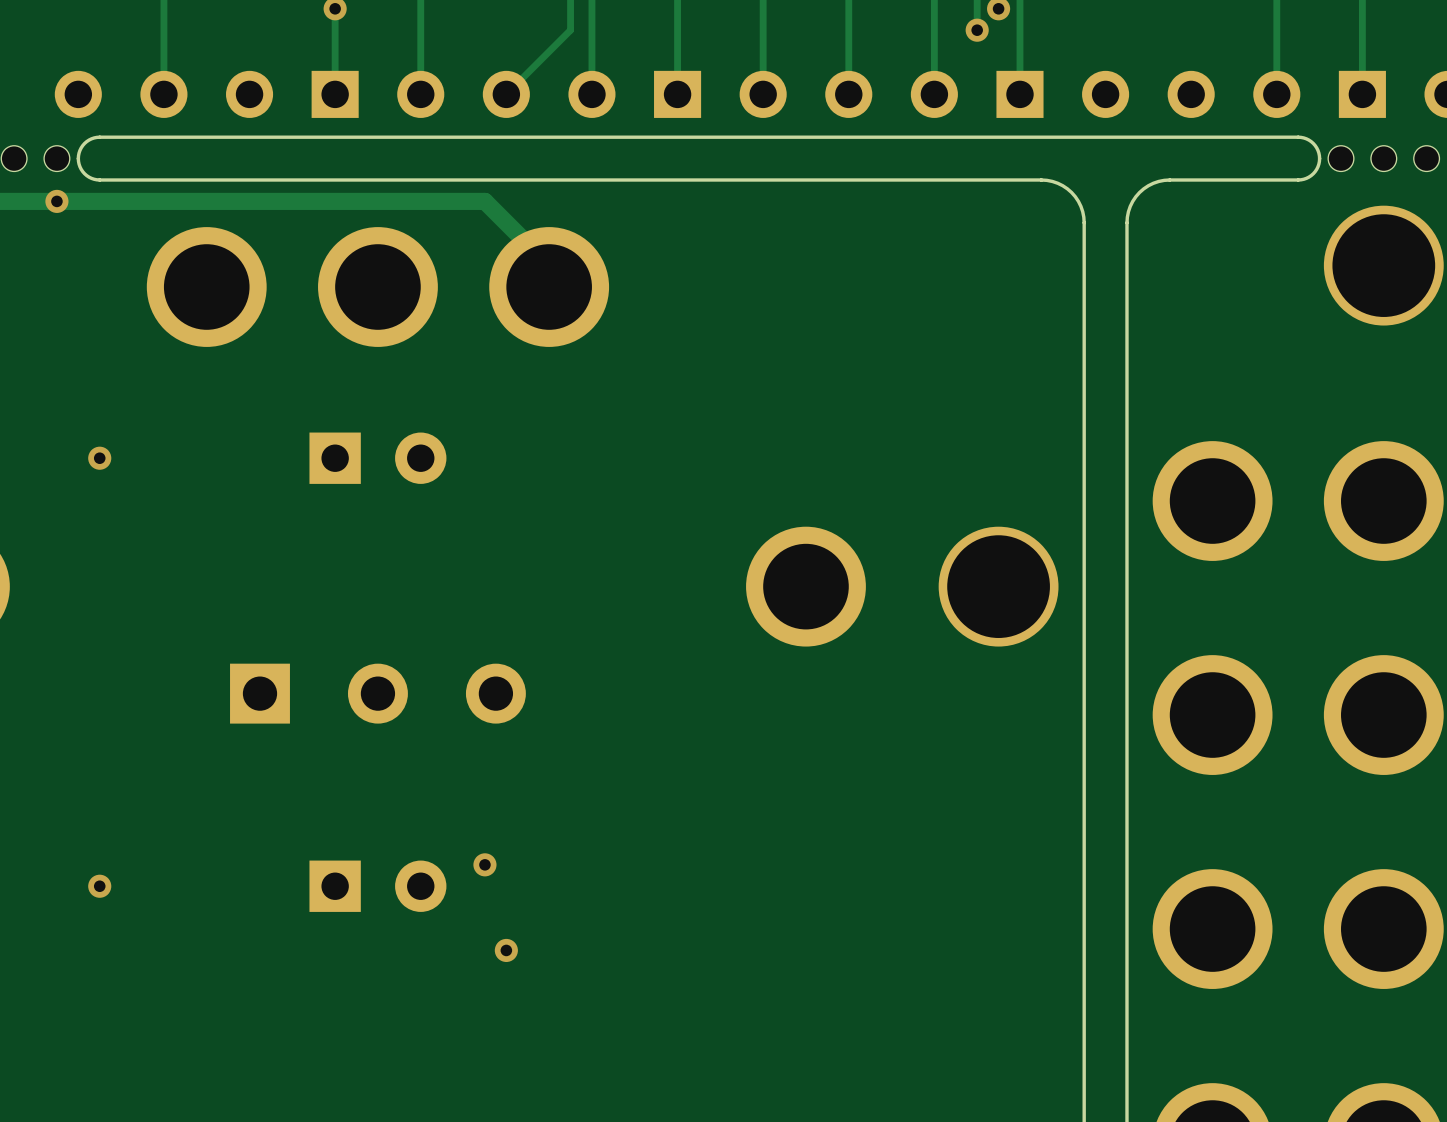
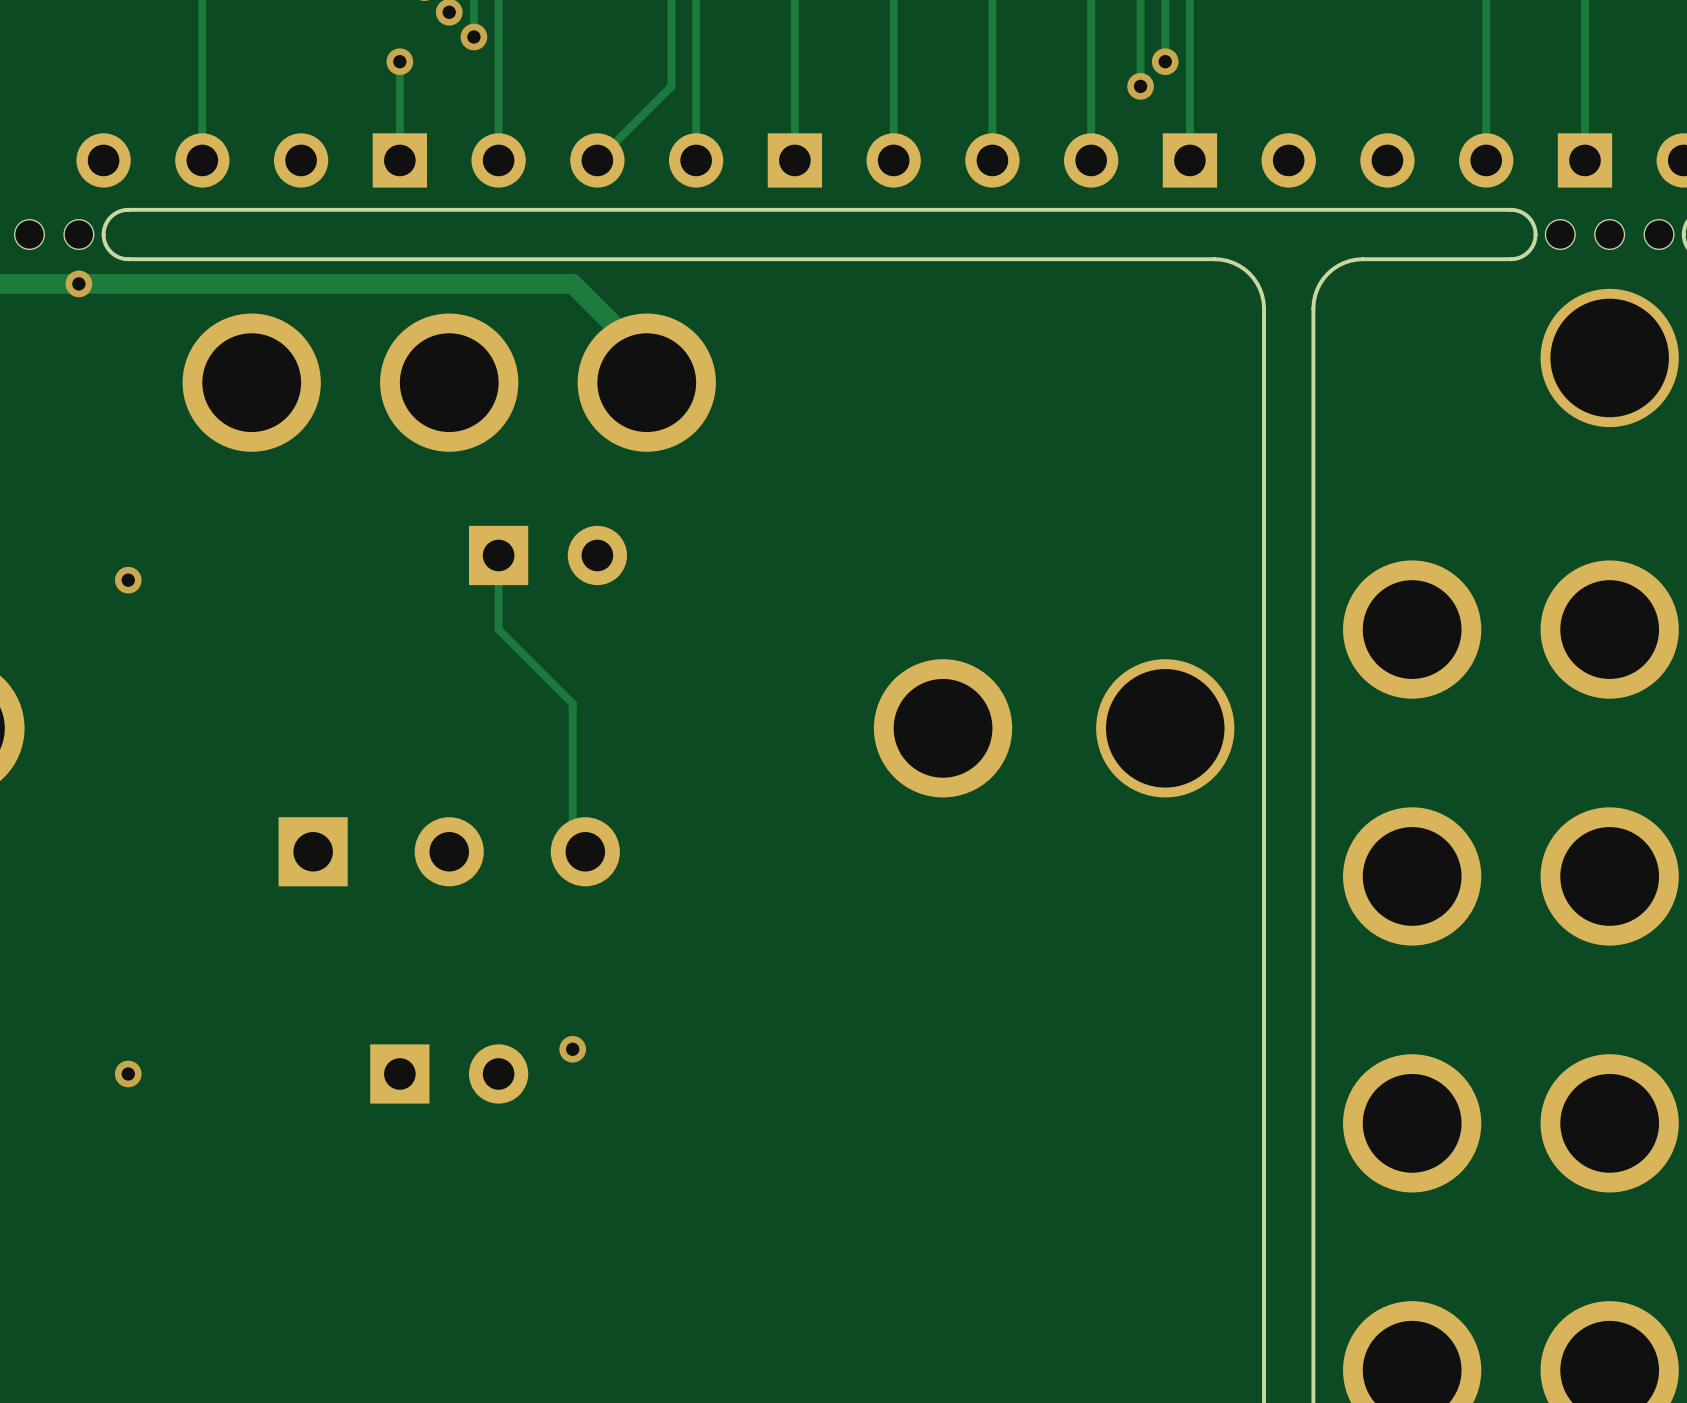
track: none -> (498, 555) (498, 629) (572, 703) (572, 839) (585, 851)
part position: (377, 458) -> (548, 555)
via: (506, 950) -> none

